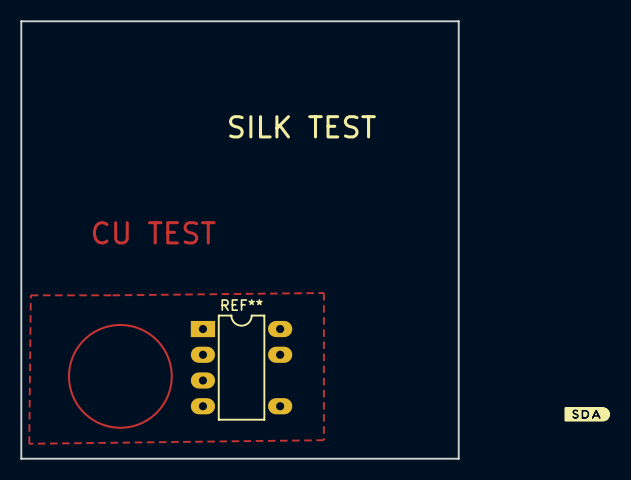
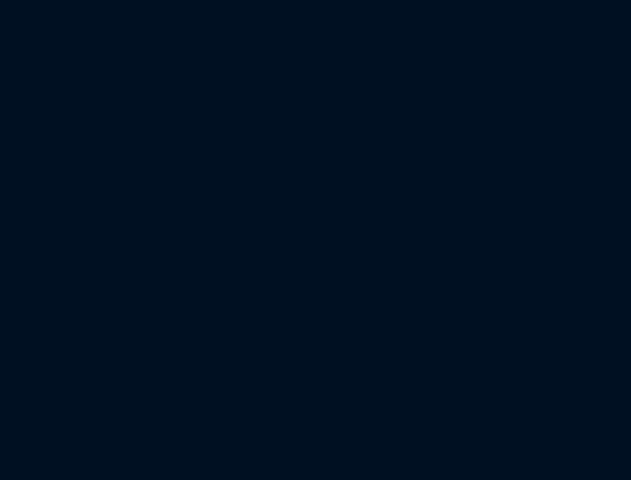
board edge: (21, 21) (458, 21) (458, 458) (21, 458) (21, 21) -> none
text: SILK TEST (302, 126) -> none
text: CU TEST (154, 232) -> none
zone outline: (323, 293) (30, 295) (29, 443) (323, 440) (323, 293) -> none
drawing: [67, 323, 173, 429] -> none
REF**: (241, 367) -> none
drawing: [564, 407, 610, 422] -> none

